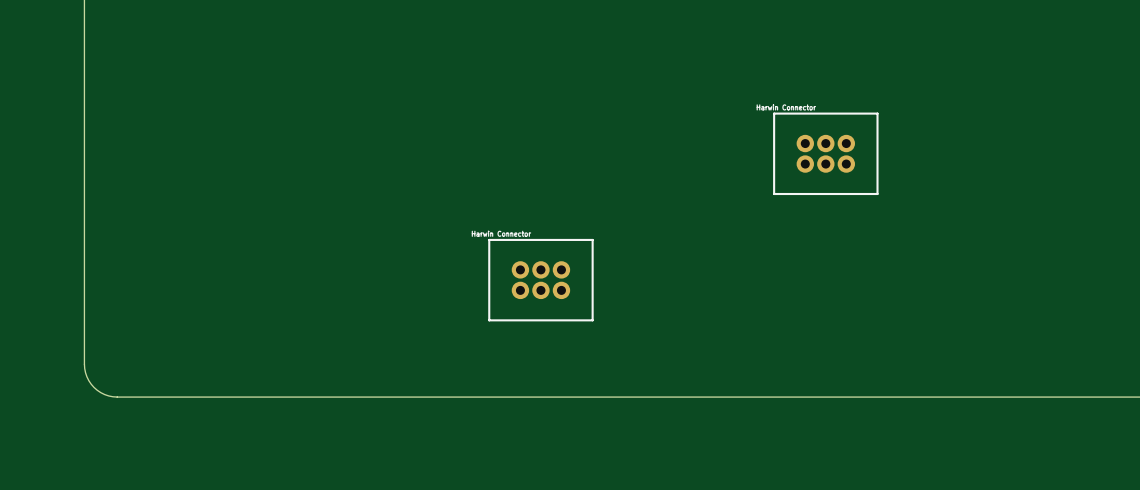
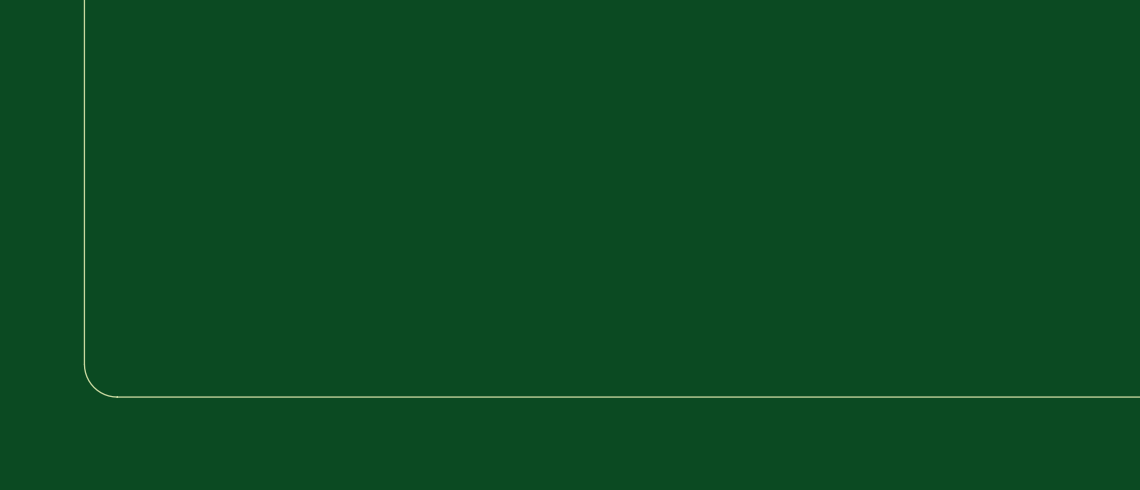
part: (825, 153) -> none
part: (540, 280) -> none

